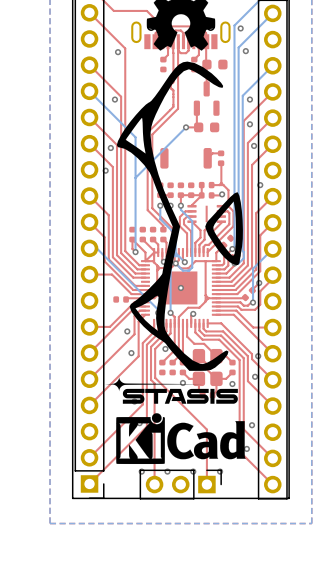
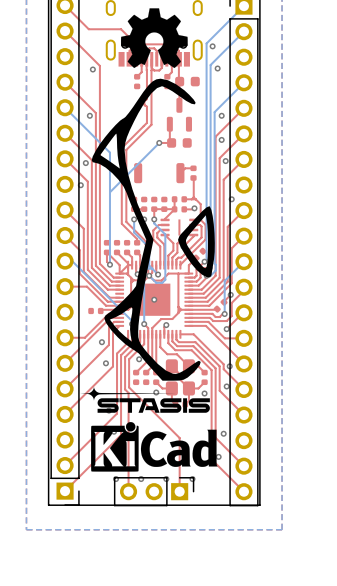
top track: none -> (243, 312) (226, 329)
via: none -> (226, 329)

